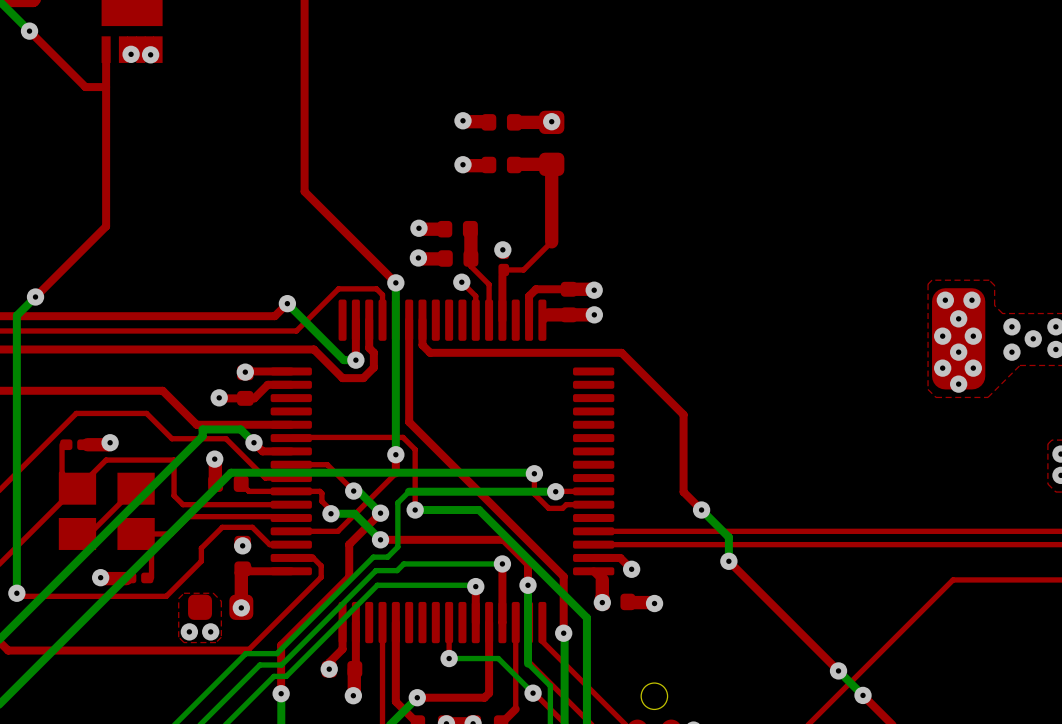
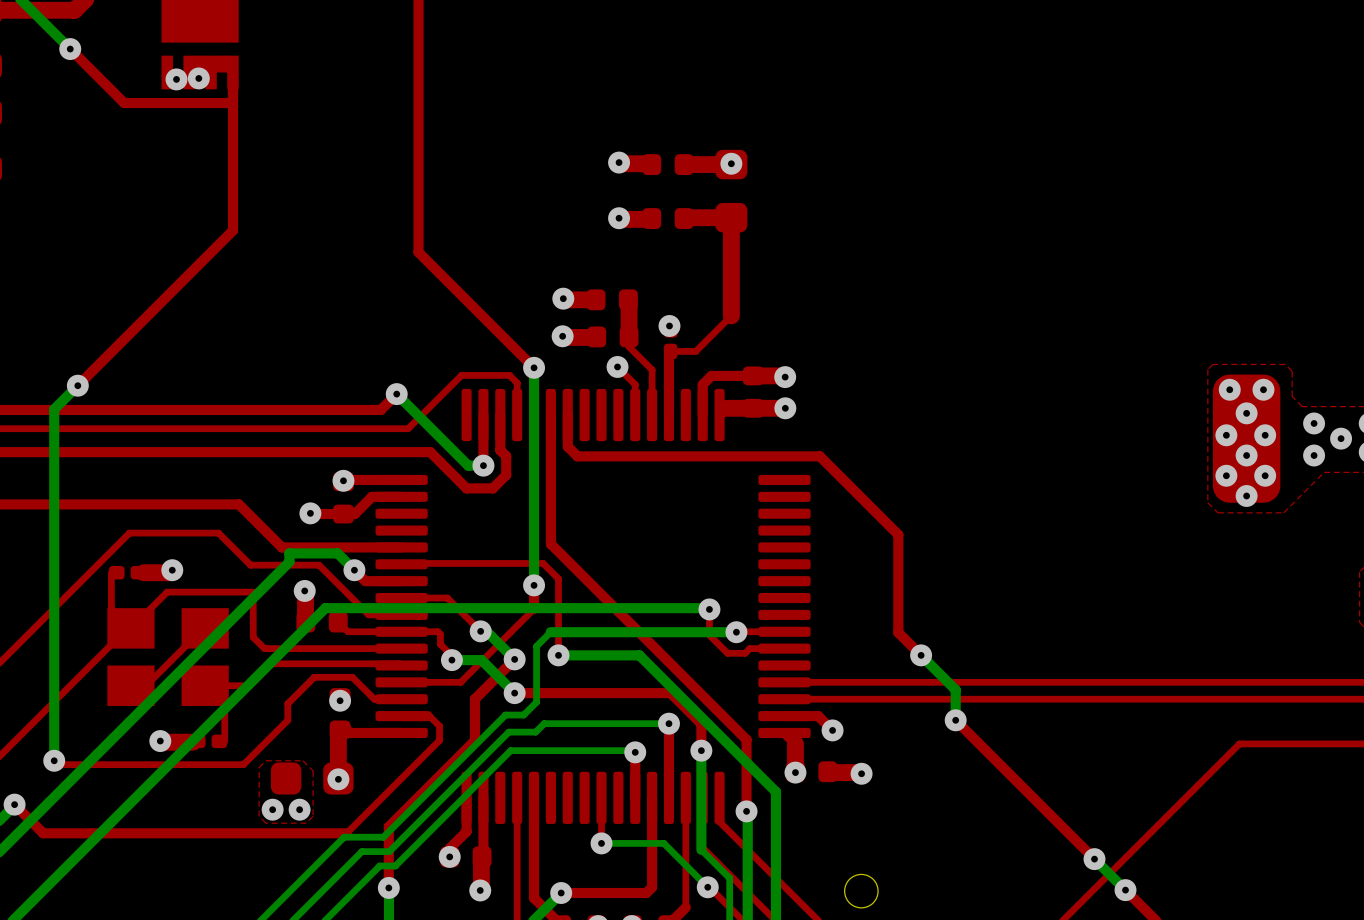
top track: (106, 49) (106, 226) -> (233, 72) (233, 230) (167, 296)
via position: (150, 54) -> (176, 79)
top track: (72, 73) (85, 87) (106, 87) -> (124, 103) (229, 103) (233, 99)

